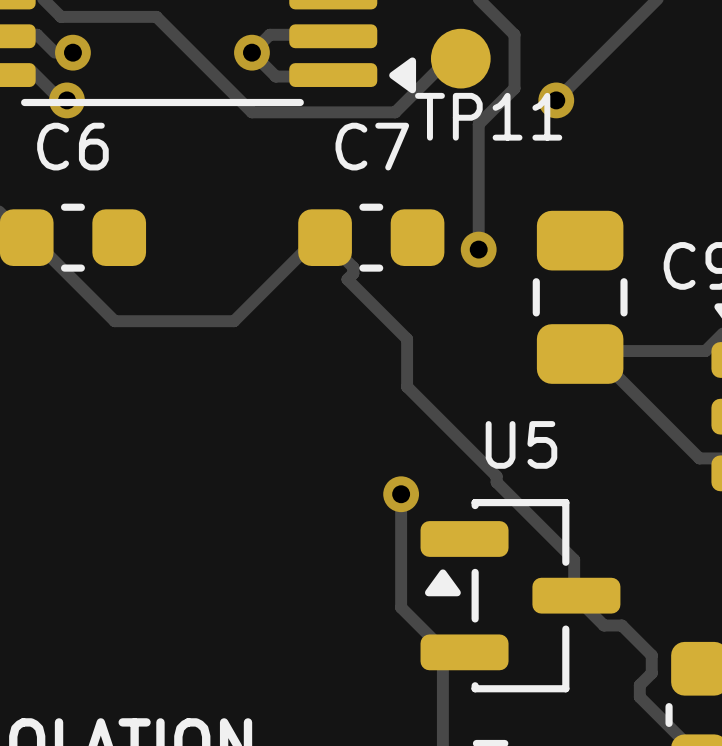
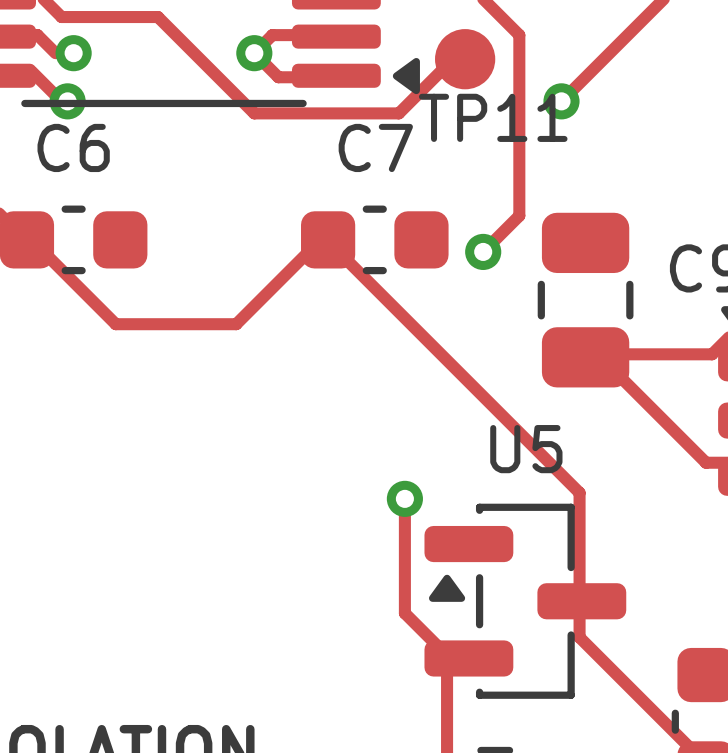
track: (514, 88) (478, 124) (478, 249) -> (519, 89) (519, 215) (483, 251)
track: (353, 267) (353, 273) (347, 279) (407, 339) (407, 386) (496, 476) (496, 482) (574, 559) -> (356, 270) (579, 492) (579, 565)
track: (574, 595) (604, 625) (621, 625) (651, 655) (651, 673) (639, 685) (639, 697) -> (579, 601) (579, 637) (645, 703)

